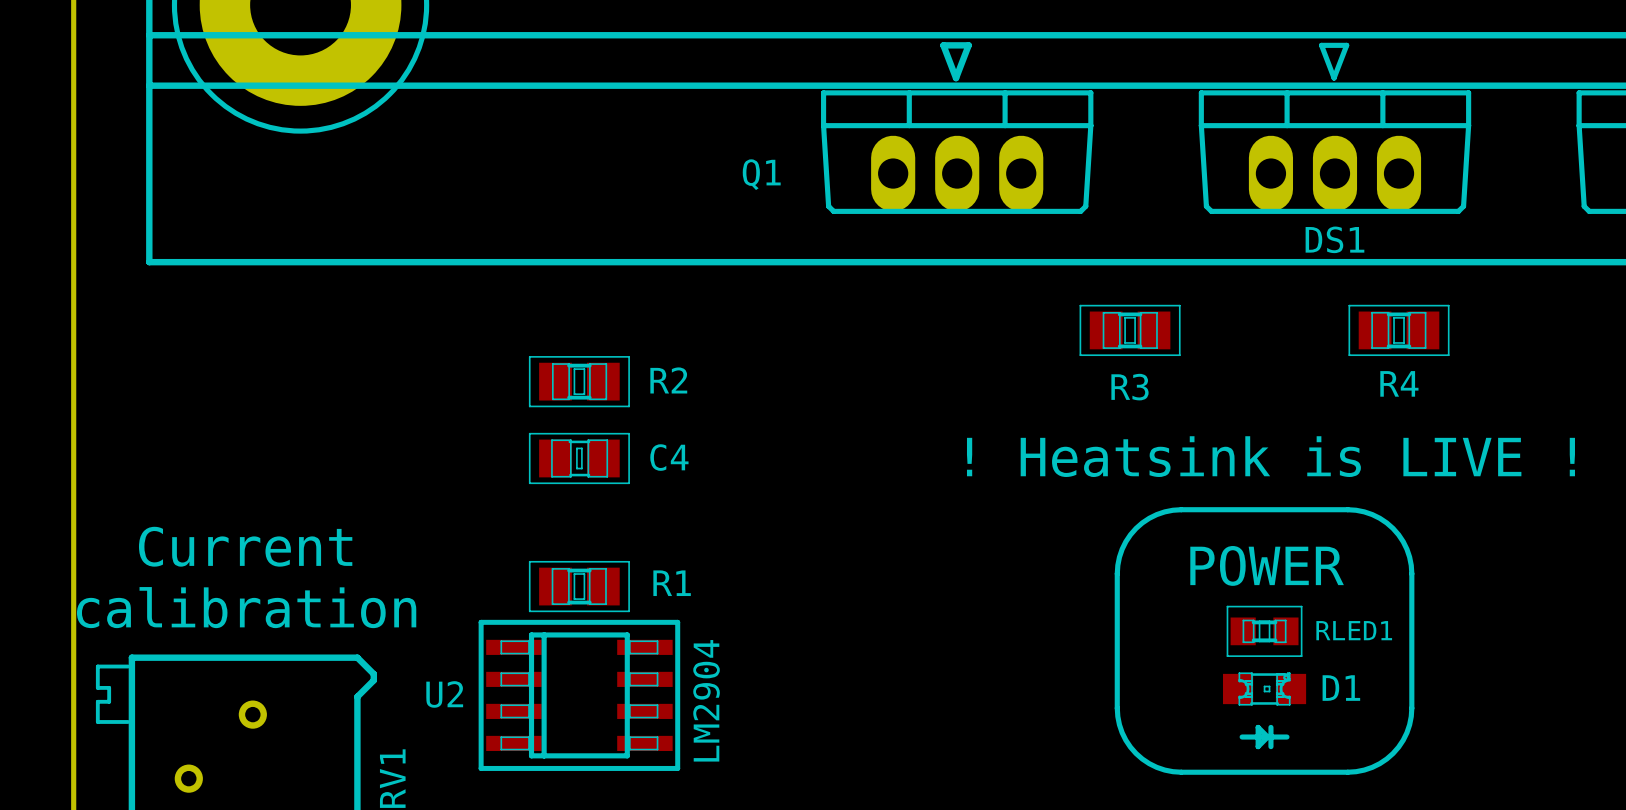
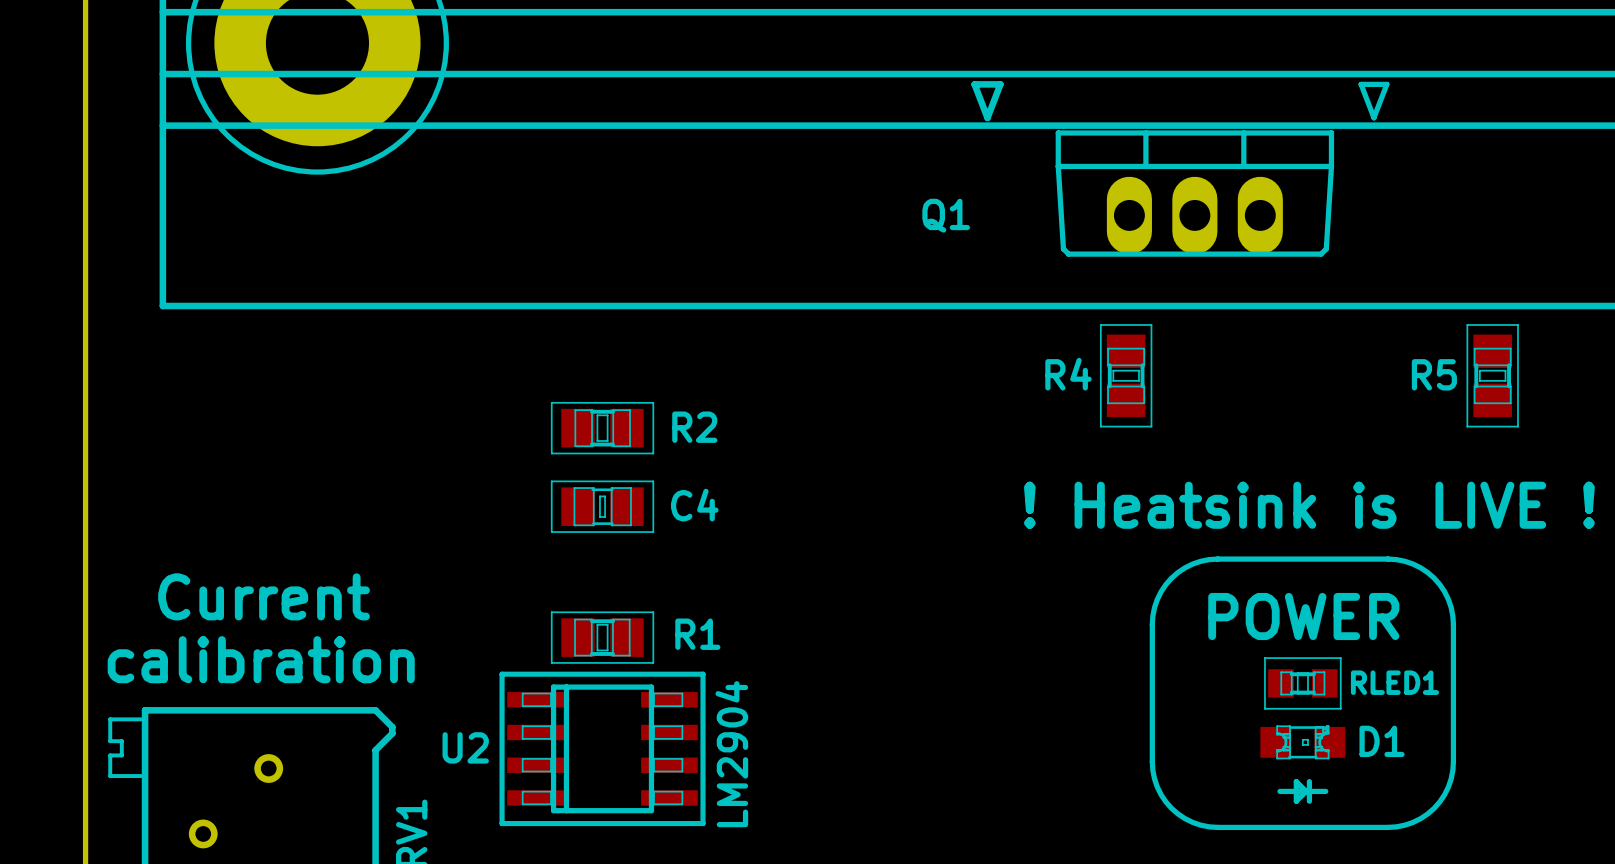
Q1 position: (957, 152) -> (1194, 193)
DS1: (1334, 152) -> none
Q1 name position: Q1 (761, 174) -> Q1 (946, 215)
R3: (1130, 330) -> none
R4 rotation: 0° (1399, 330) -> 90° clockwise (1126, 375)
R4 position: (1399, 330) -> (1126, 375)
R5: none -> (1492, 375)

